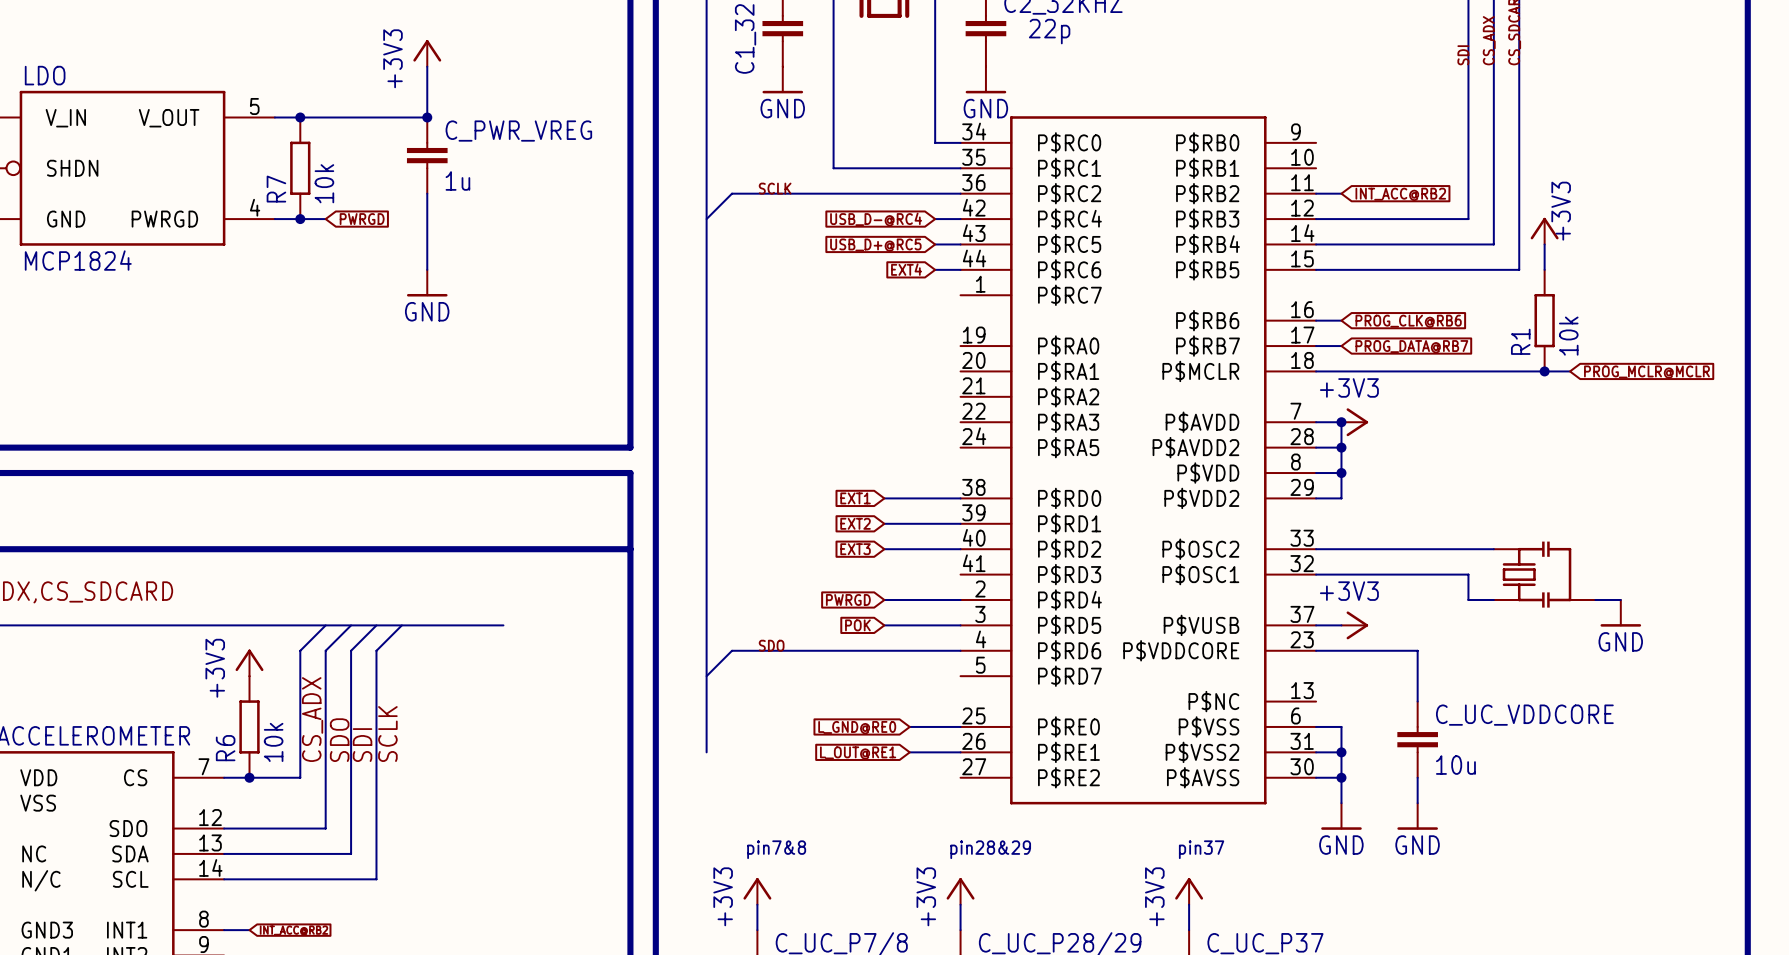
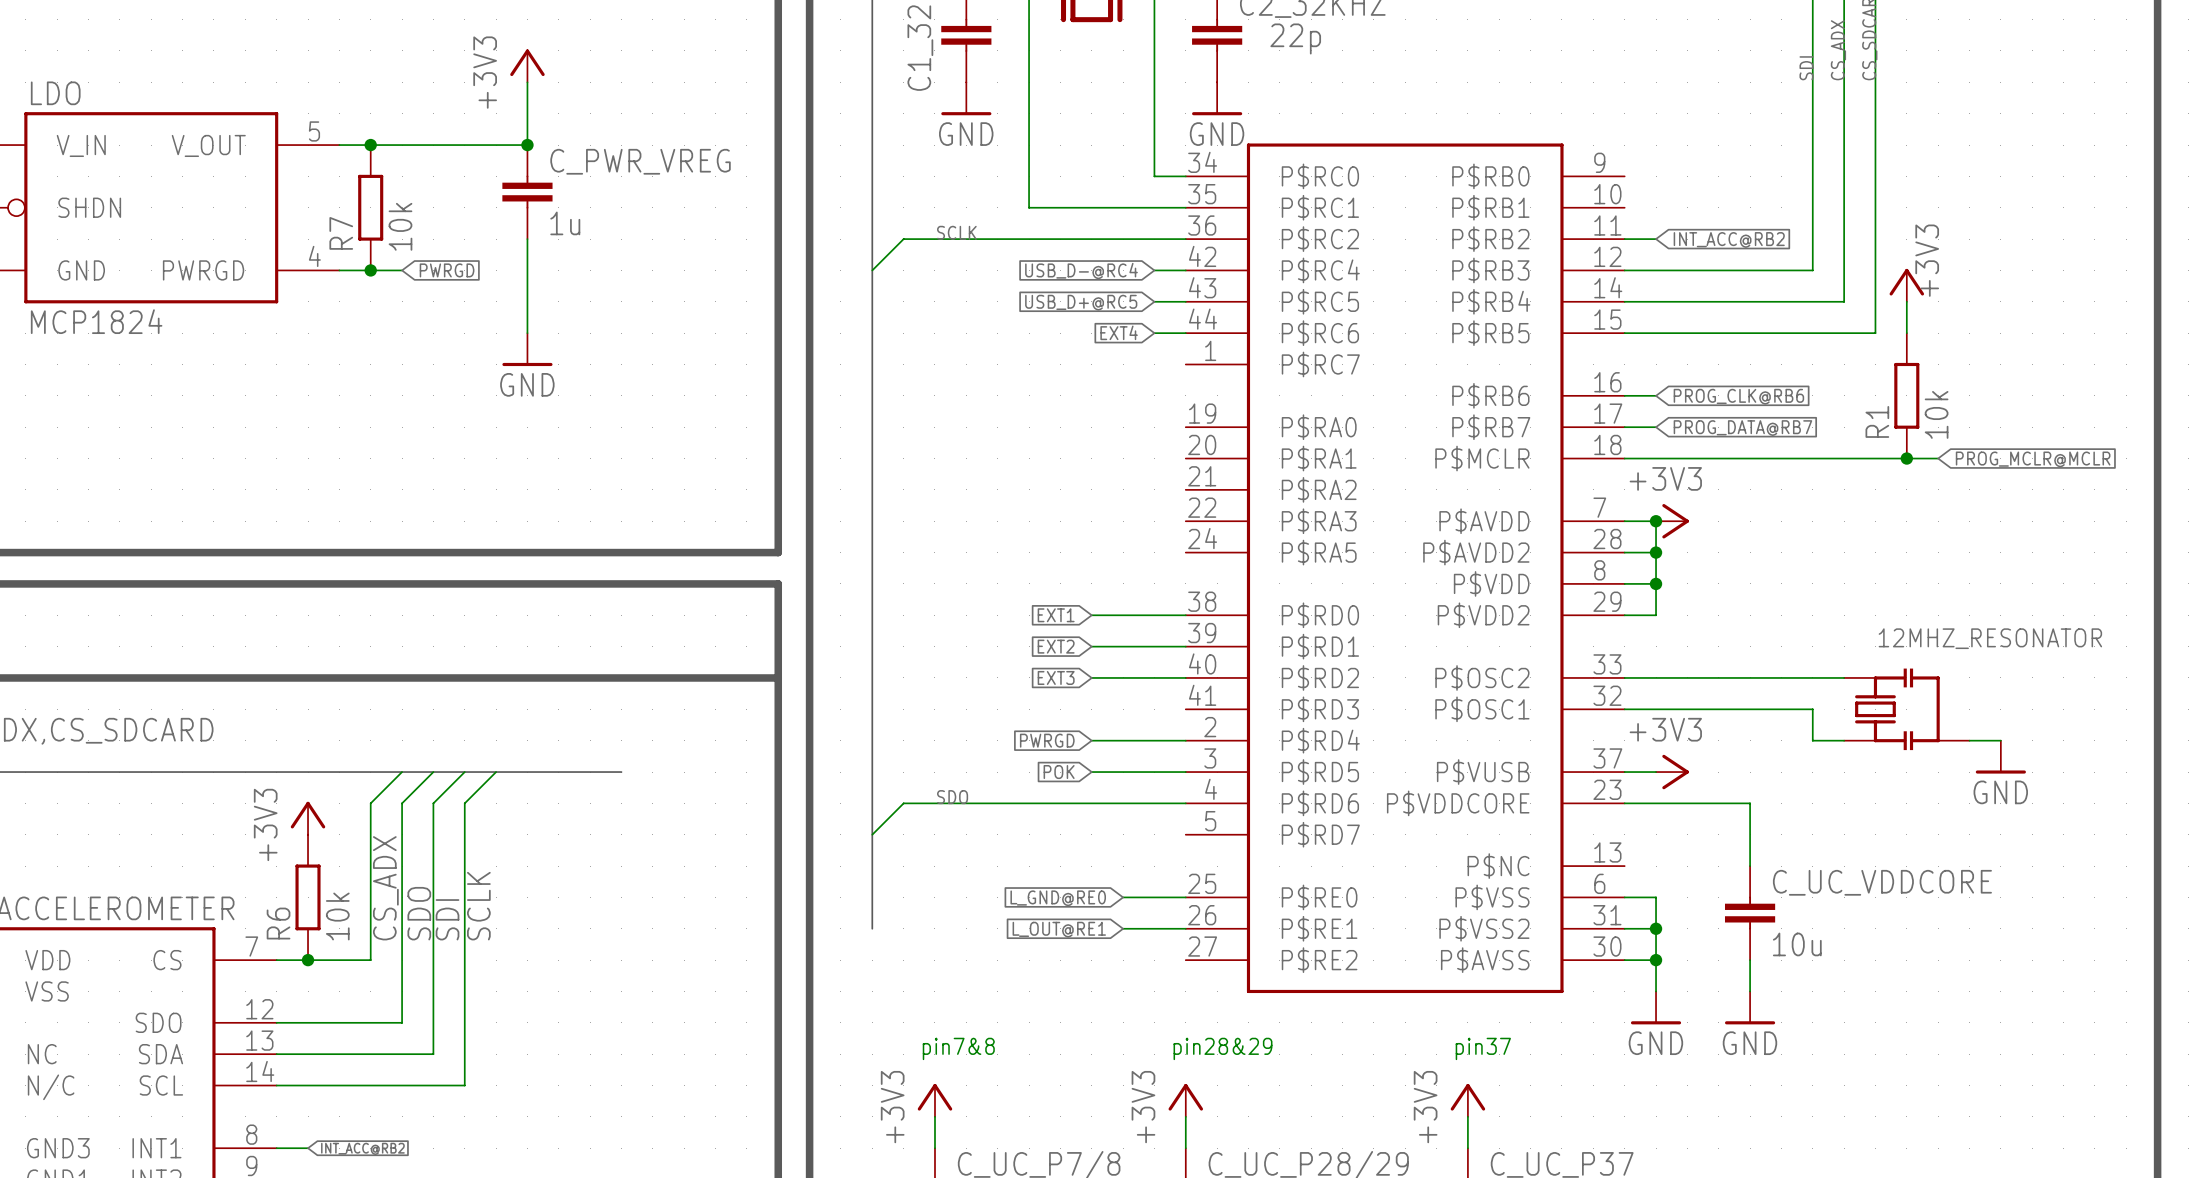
12MHZ_RESONATOR name: none -> 12MHZ_RESONATOR (1990, 638)

